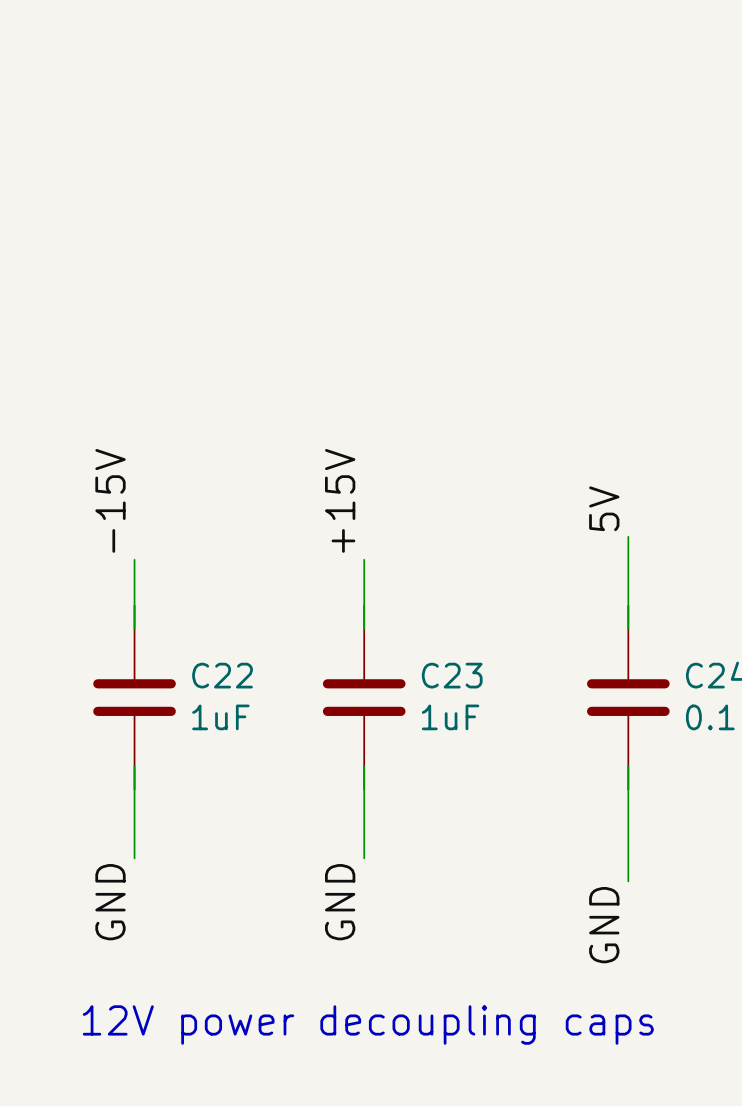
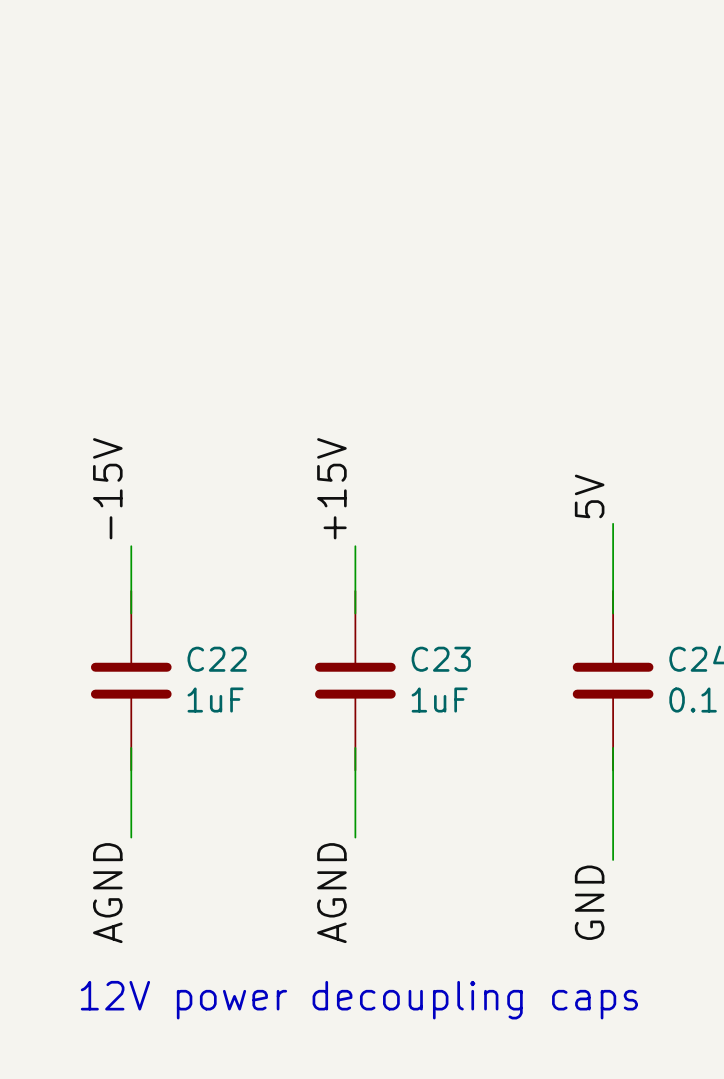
label: GND (110, 902) -> AGND (107, 893)
label: GND (340, 902) -> AGND (331, 893)

